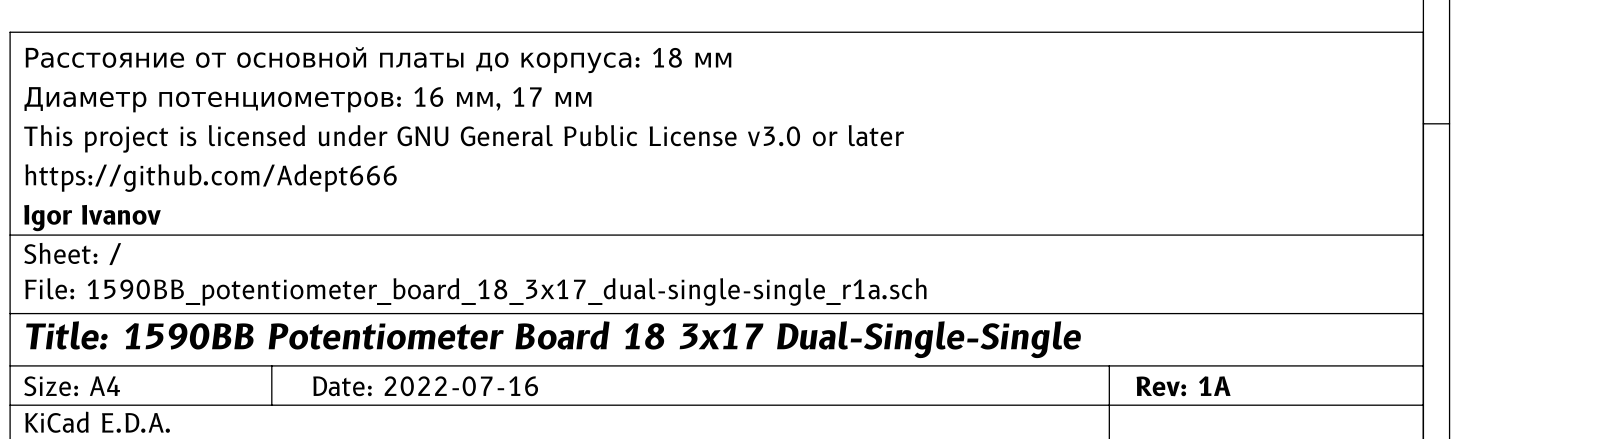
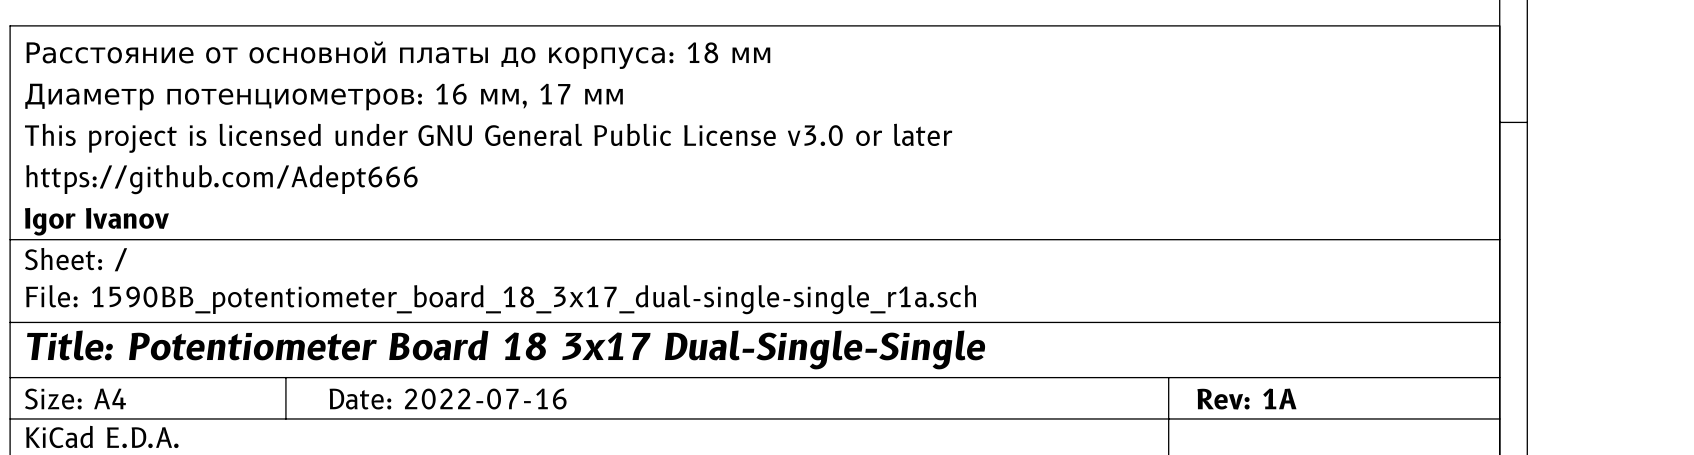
title block: Title: 1590BB Potentiometer Board 18 3x17 Dual-Single-Single (553, 339) -> Title: Potentiometer Board 18 3x17 Dual-Single-Single (506, 349)

